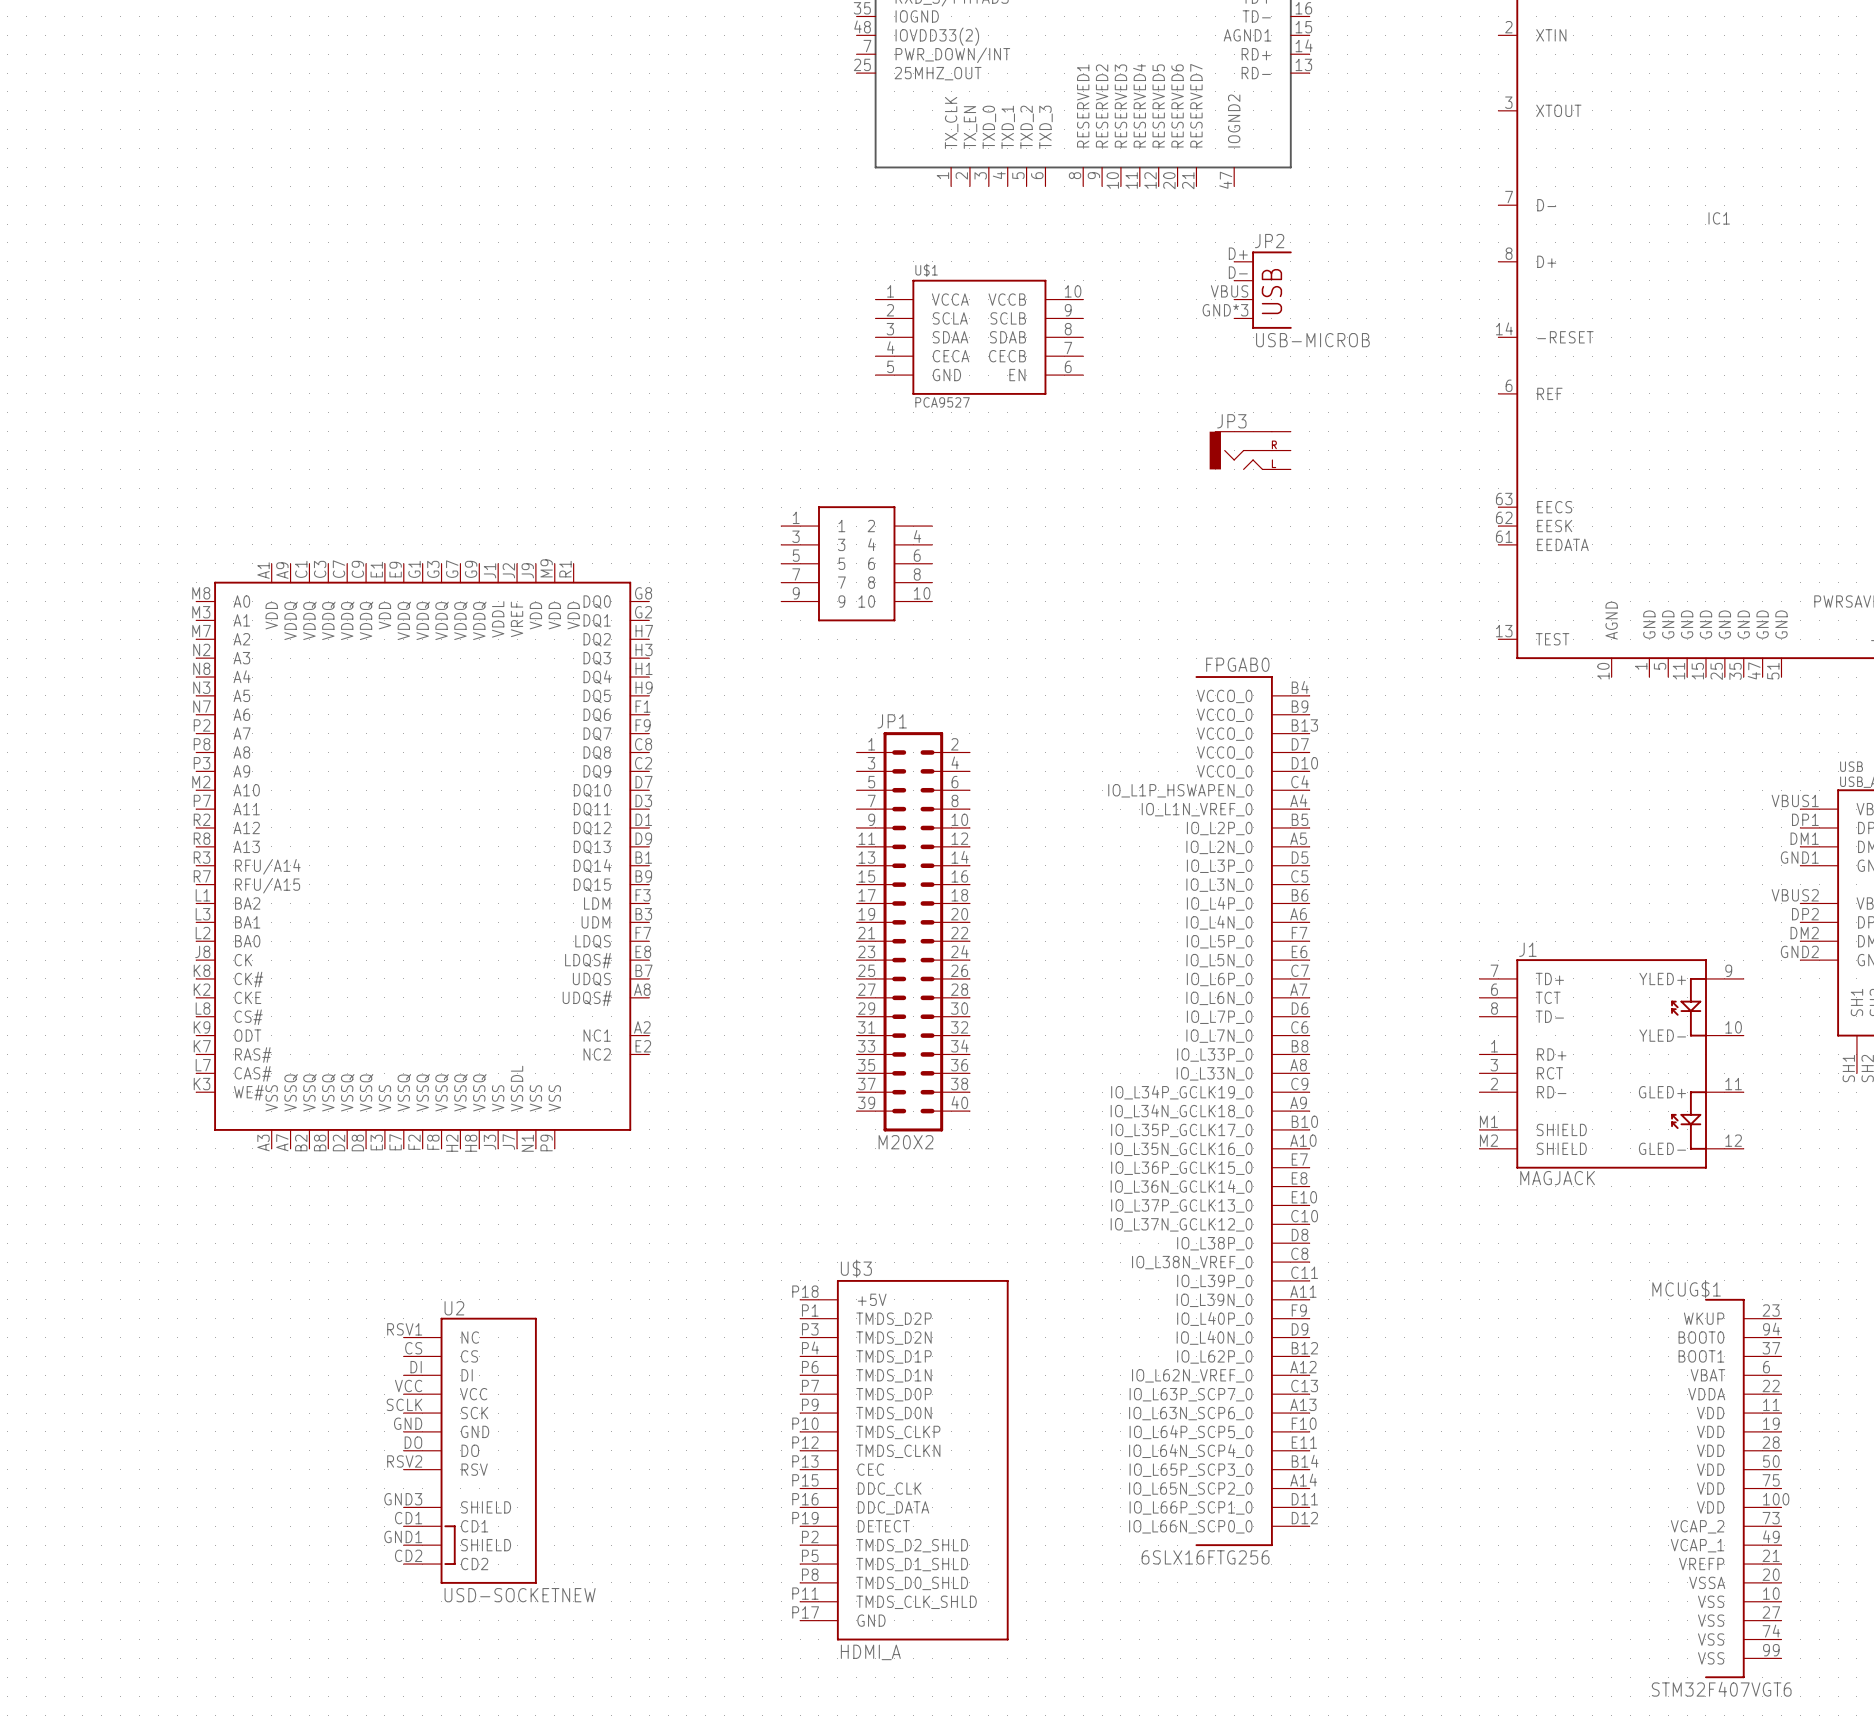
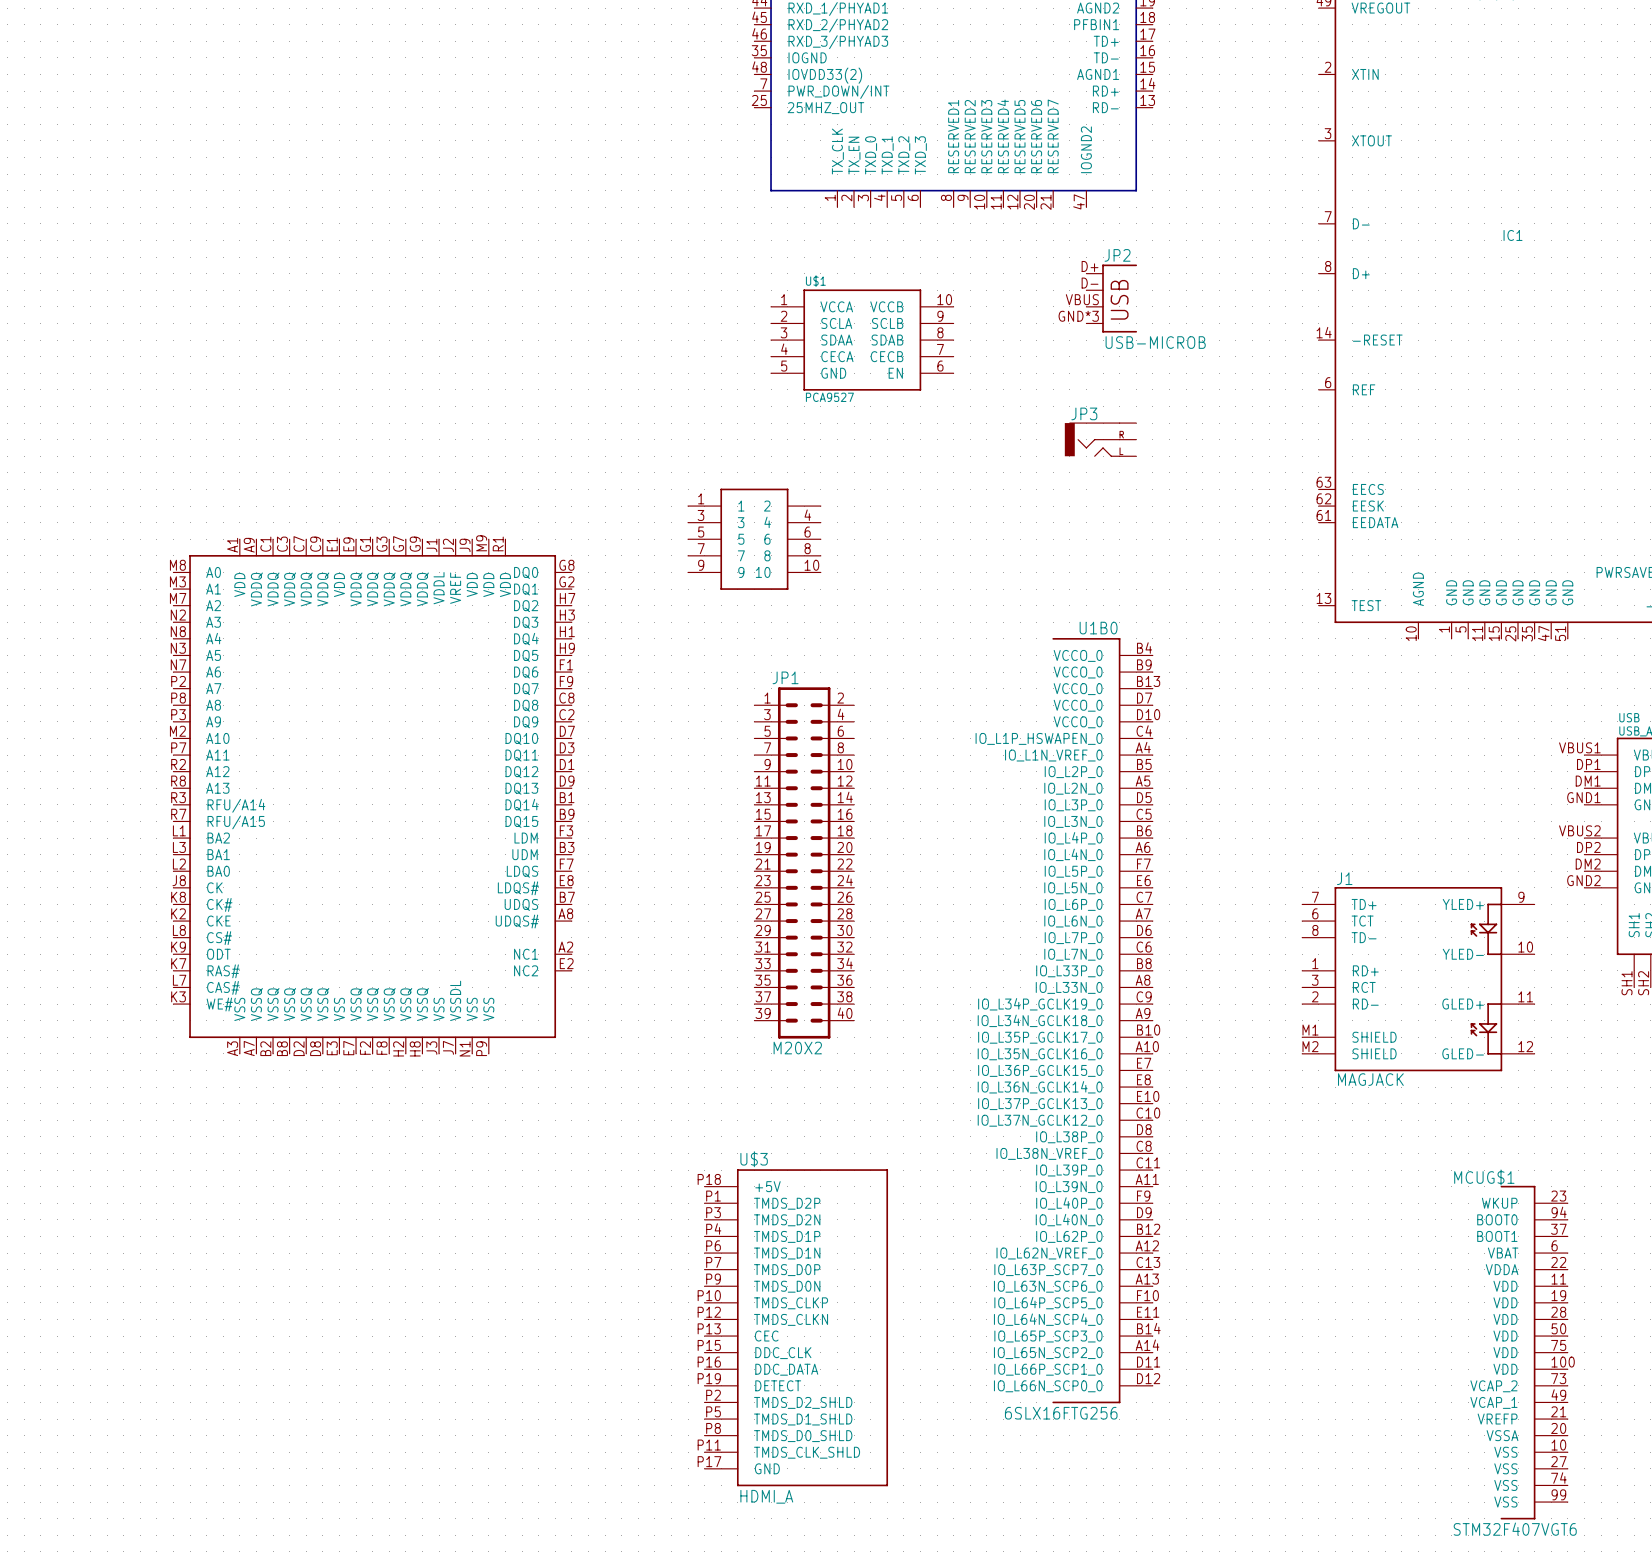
FPGAB0 name: FPGAB0 (1237, 664) -> U1B0 (1098, 628)
U2: USD-SOCKETNEW (470, 1450) -> none

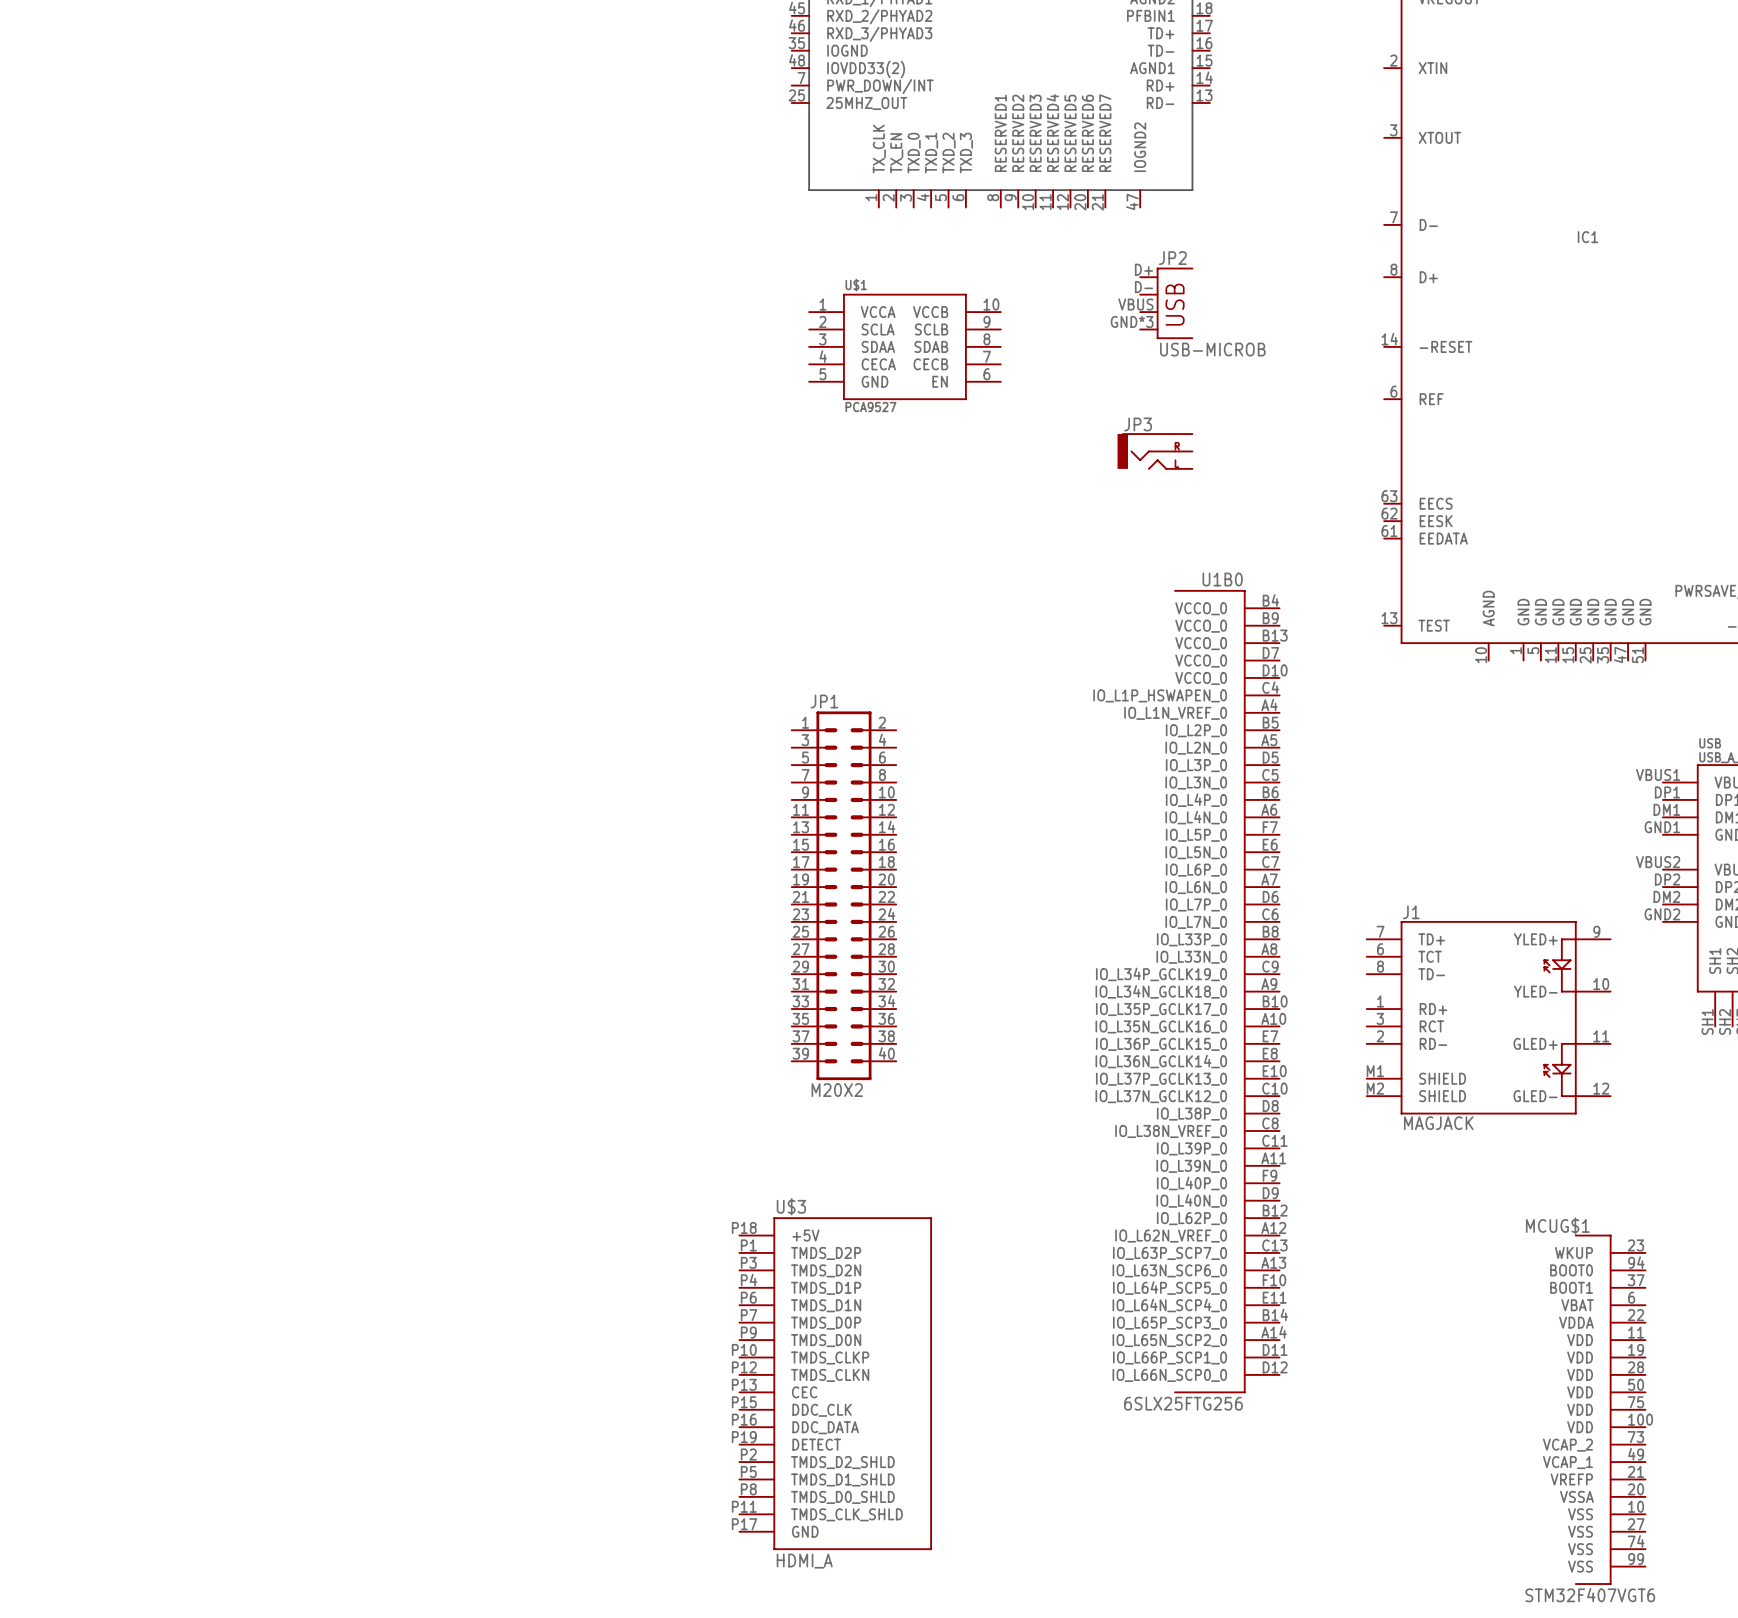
part: (754, 539) -> none
part: (372, 796) -> none
U1B0 position: (1102, 1020) -> (1226, 991)
U1B0 value: 6SLX16FTG256 (1061, 1413) -> 6SLX25FTG256 (1183, 1403)

